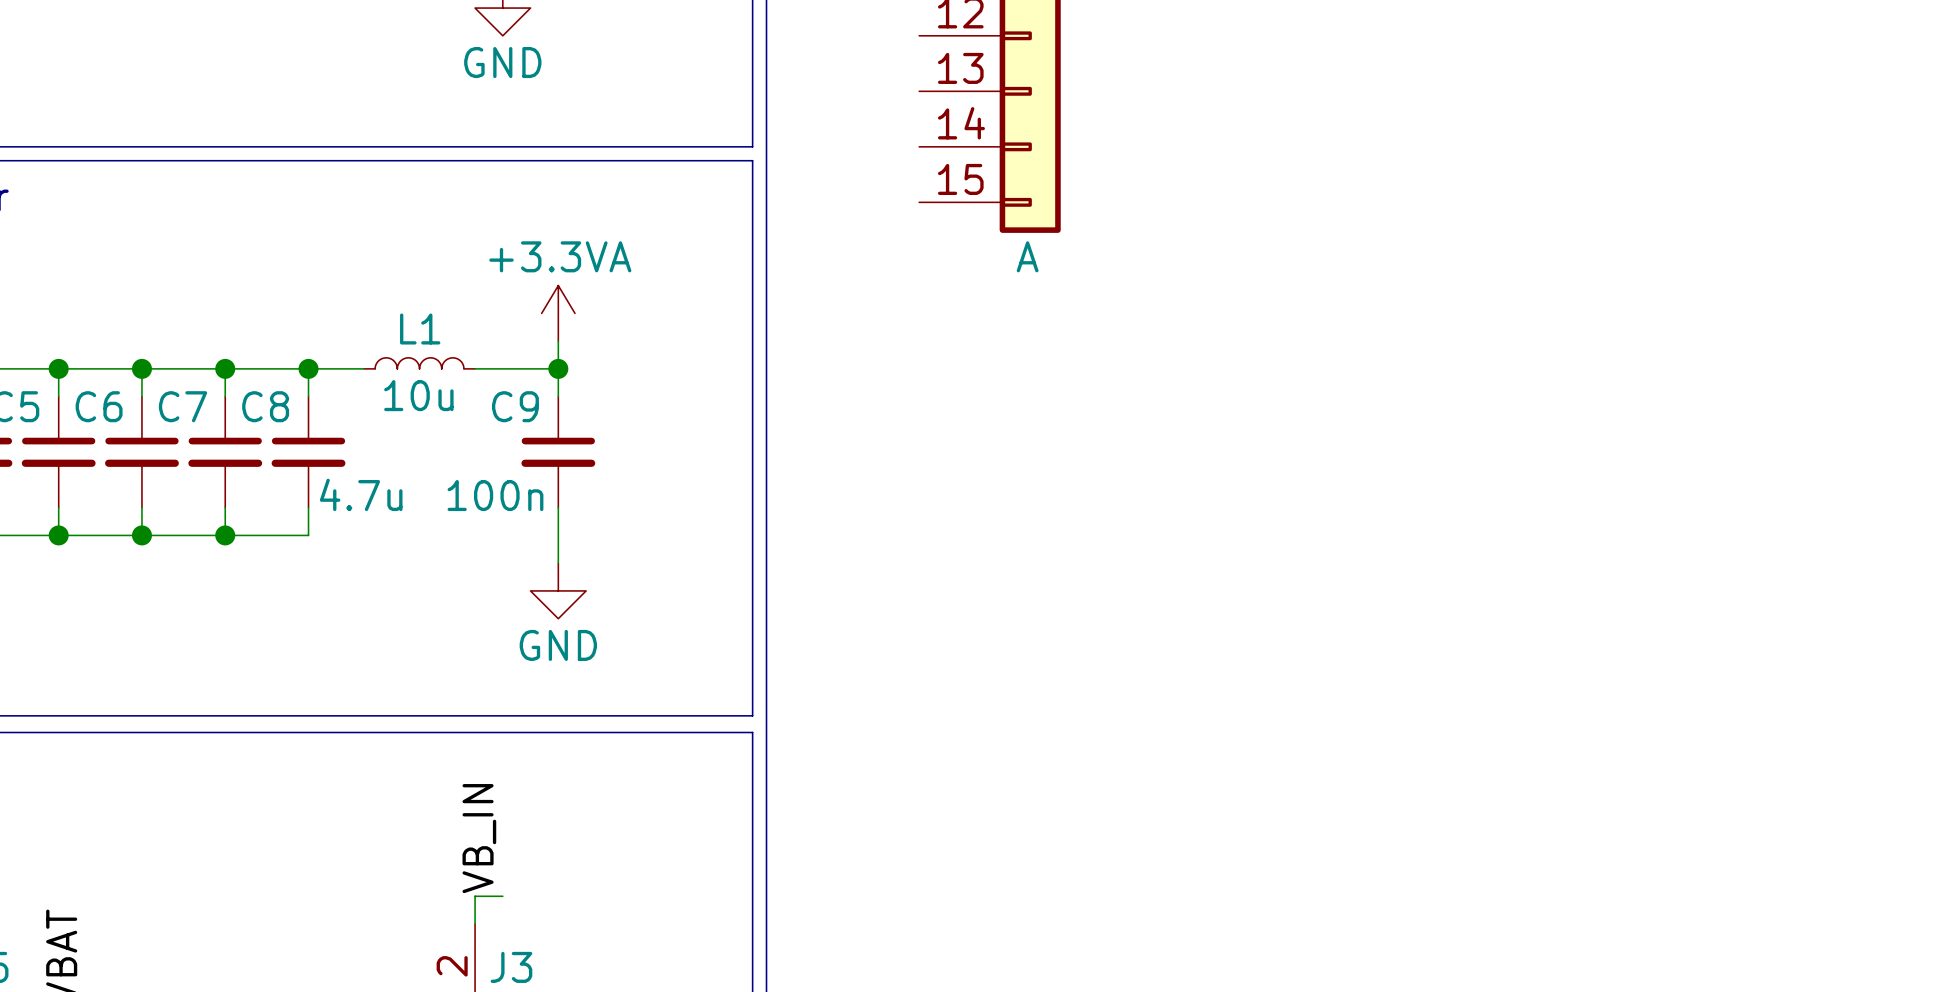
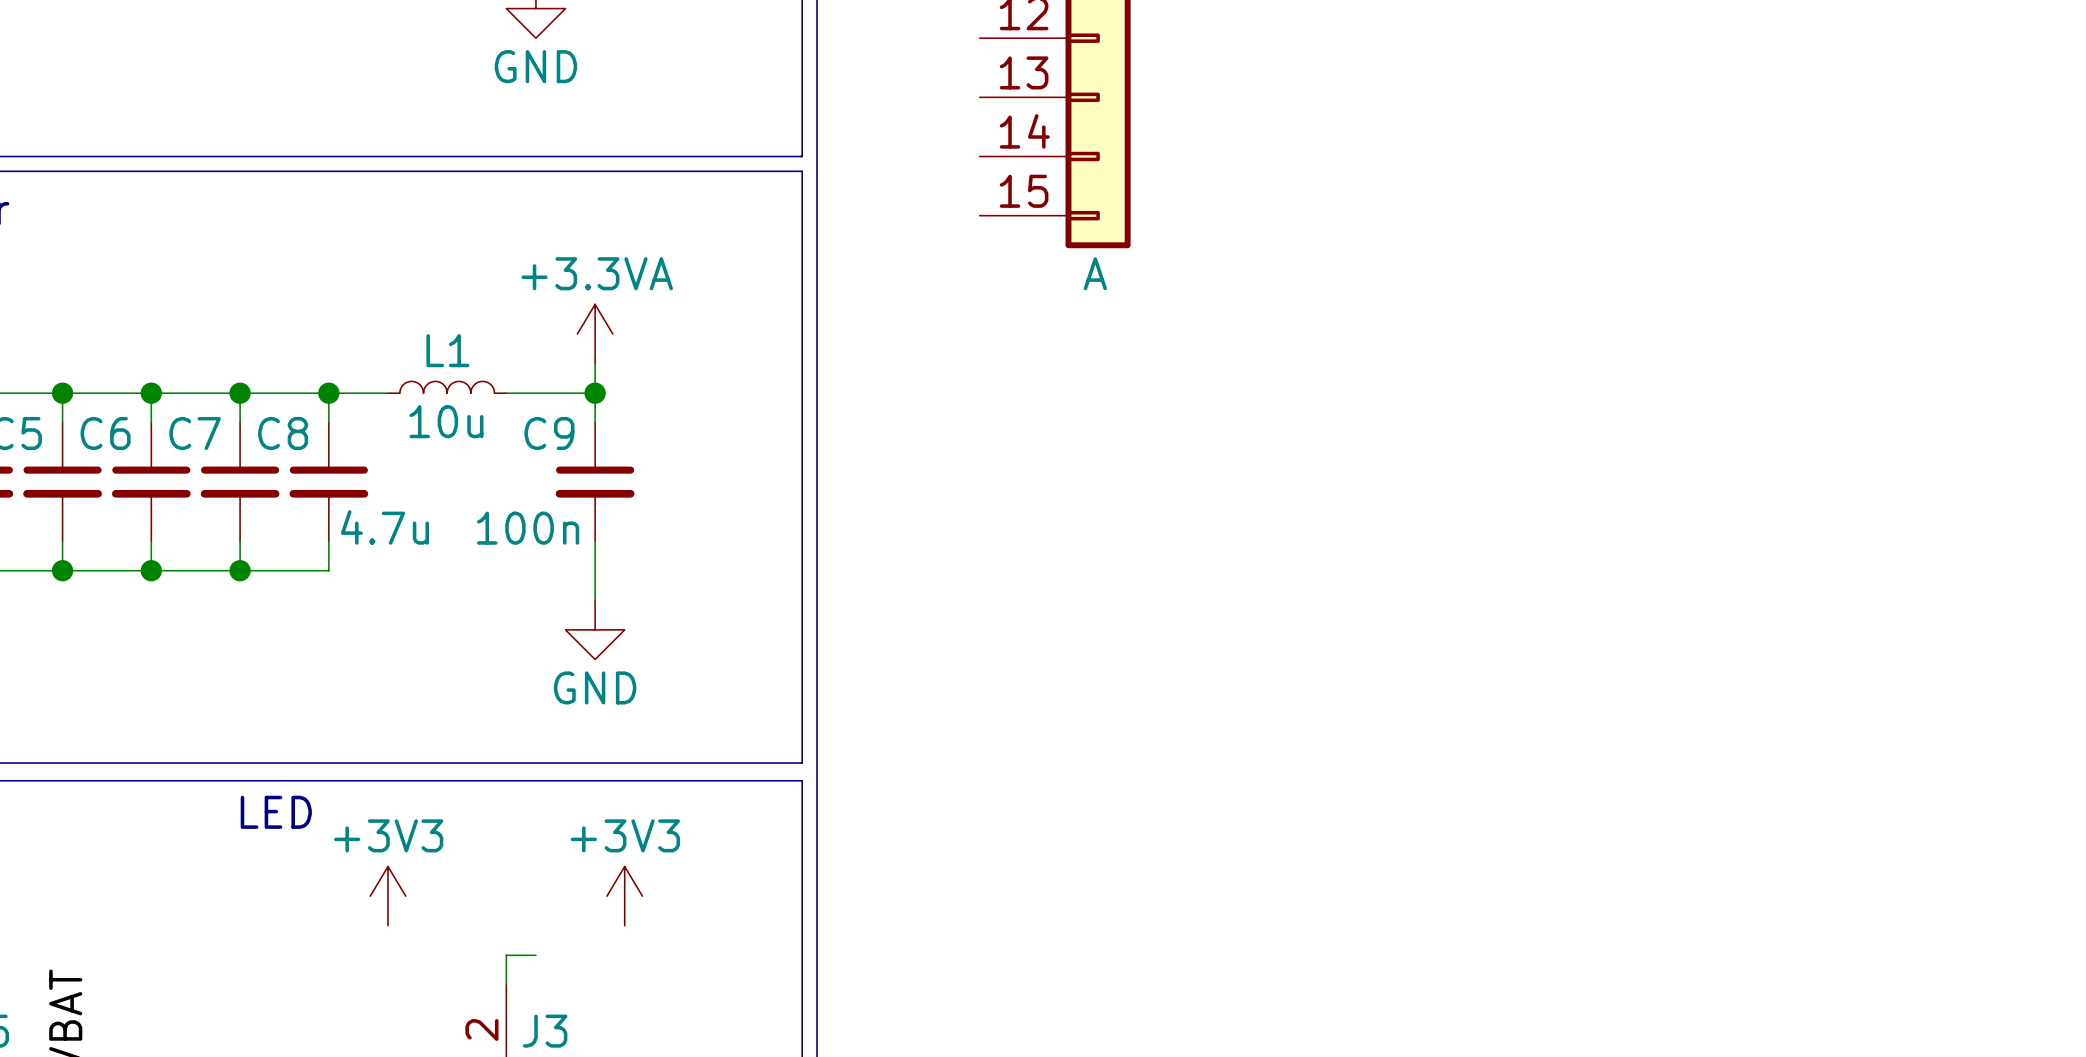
text: none -> LED (276, 812)
label: VB_IN (479, 838) -> none
power symbol: none -> +3V3 (388, 896)
power symbol: none -> +3V3 (624, 896)

